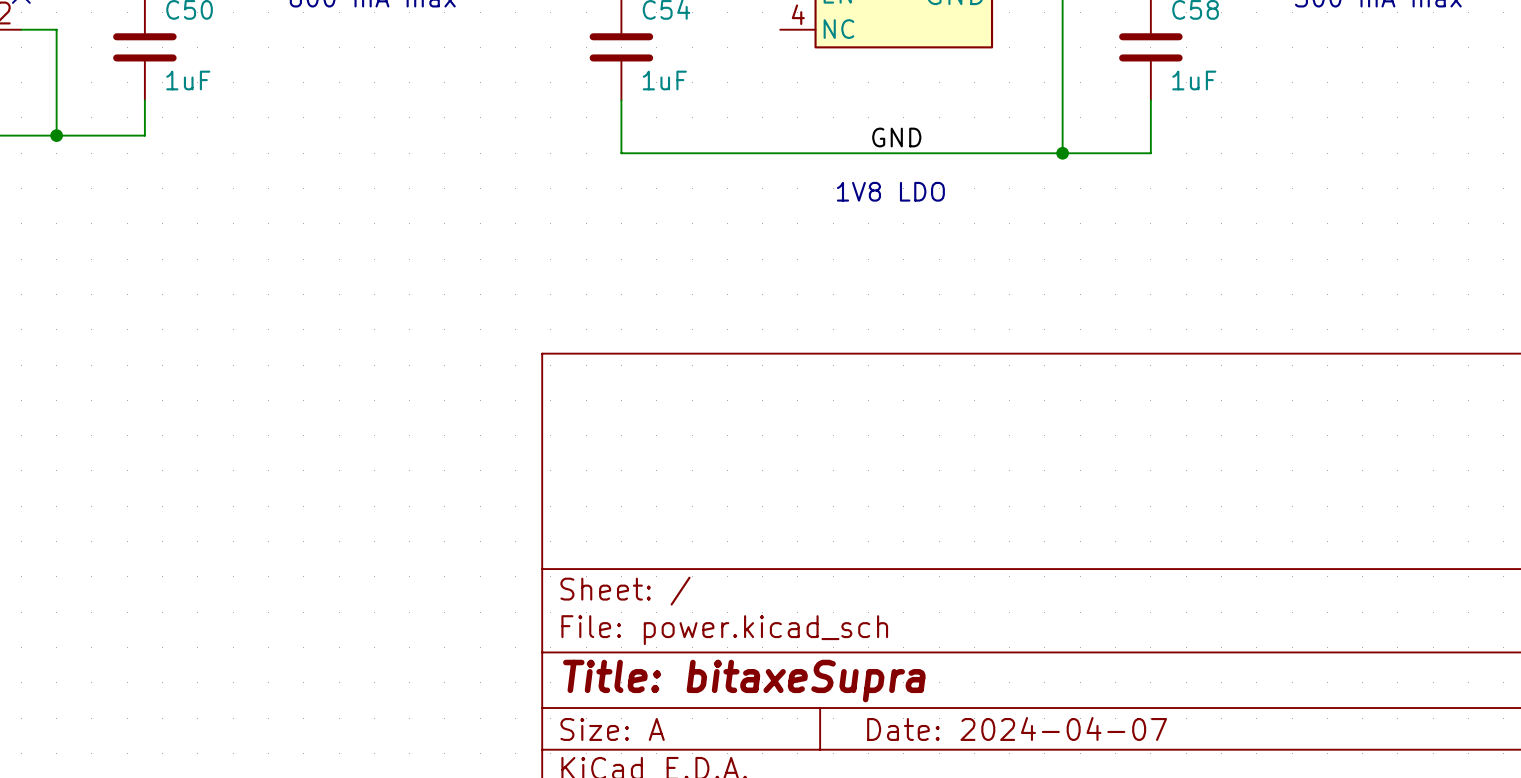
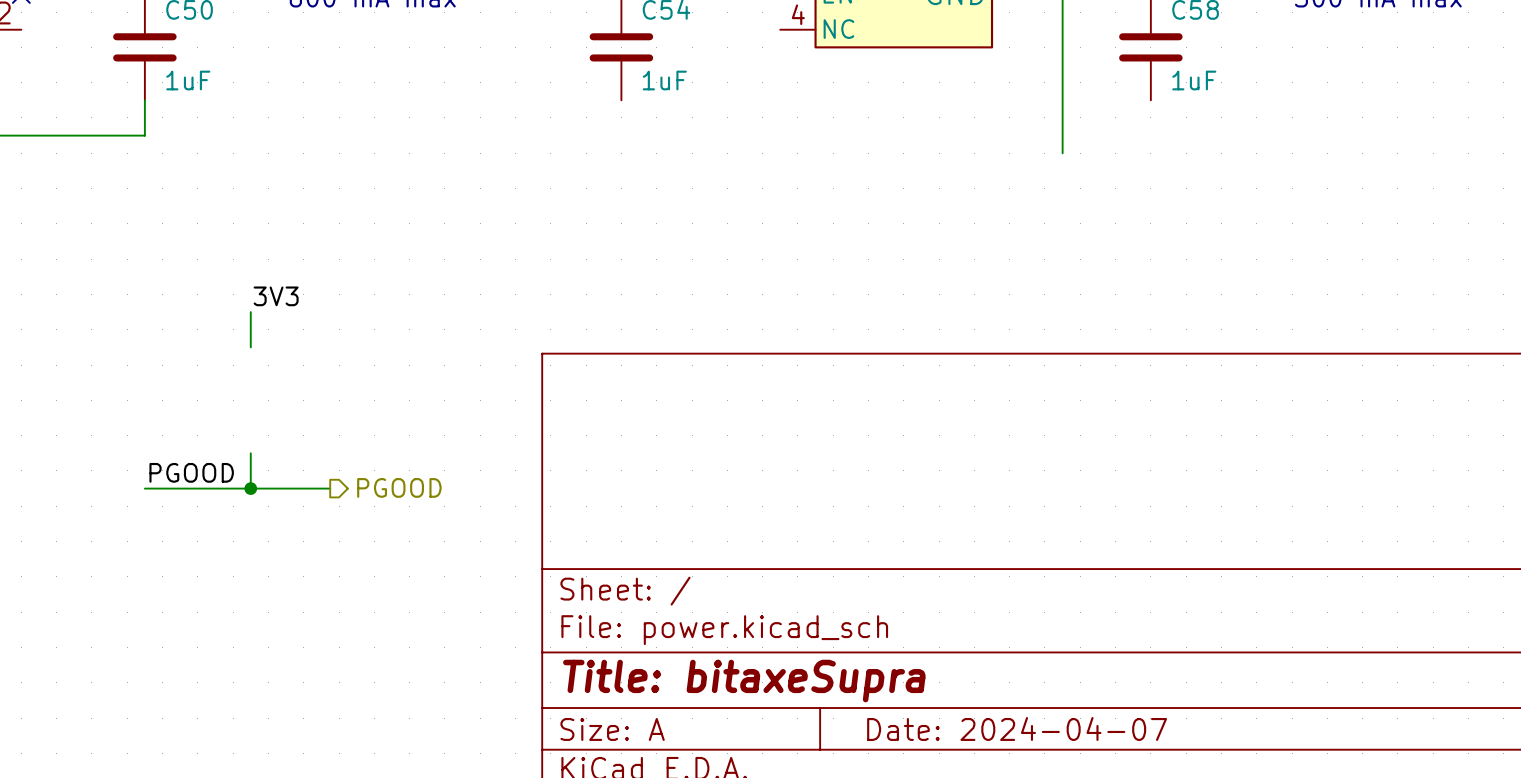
wire: (21, 29) (56, 29) (56, 135) -> none
wire: (621, 100) (621, 153) (1150, 153) (1150, 100) -> none
junction: (56, 135) -> none
label: GND (896, 137) -> none
junction: (1062, 153) -> none
text: 1V8 LDO (890, 191) -> none
label: none -> 3V3 (276, 296)
wire: none -> (250, 312) (250, 347)
wire: none -> (250, 453) (250, 488)
label: none -> PGOOD (191, 472)
hierarchical label: none -> PGOOD (399, 487)
wire: none -> (144, 488) (330, 488)
junction: none -> (250, 488)

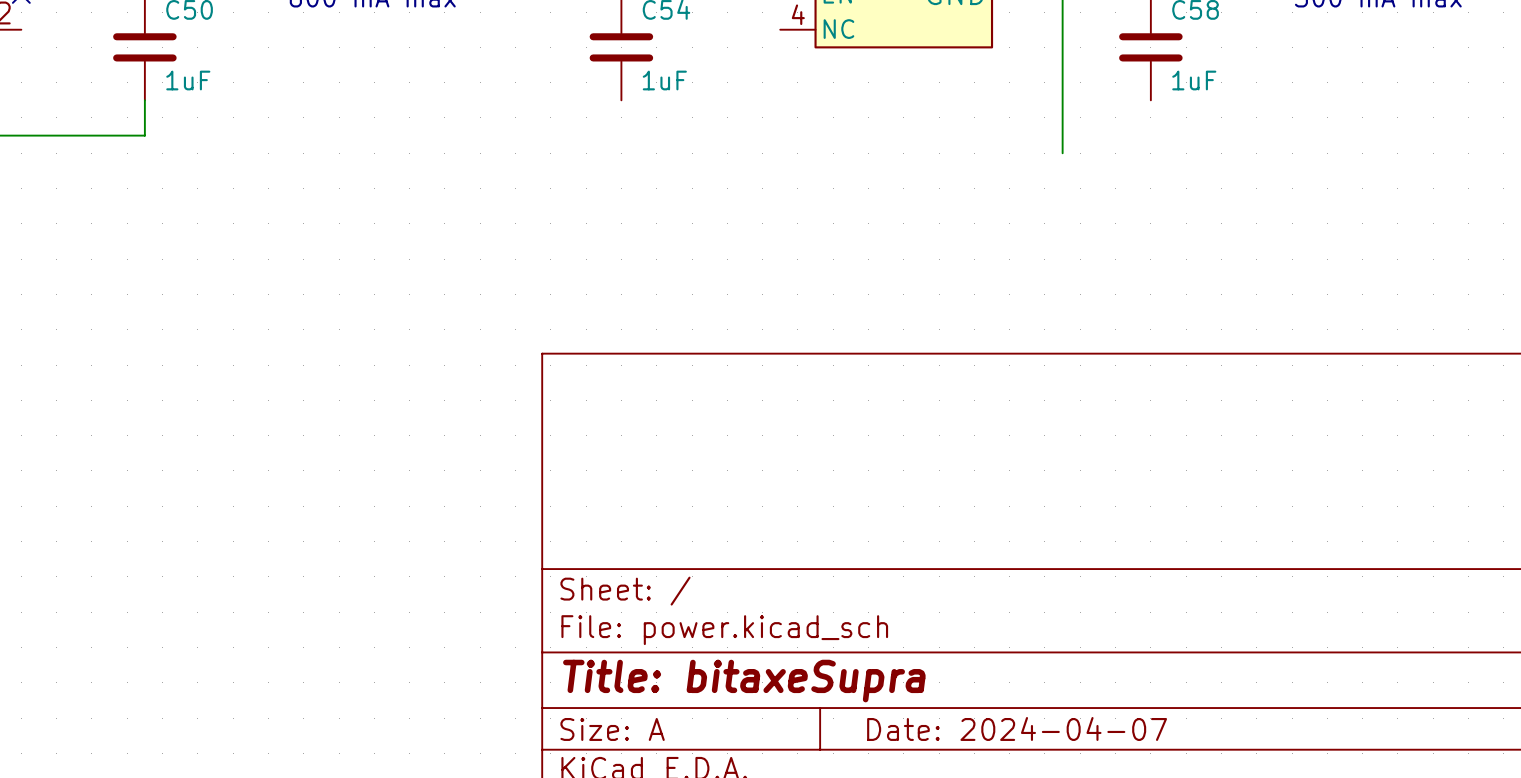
label: 3V3 (276, 296) -> none
wire: (250, 312) (250, 347) -> none
wire: (250, 453) (250, 488) -> none
label: PGOOD (191, 472) -> none
hierarchical label: PGOOD (399, 487) -> none
wire: (144, 488) (330, 488) -> none
junction: (250, 488) -> none

